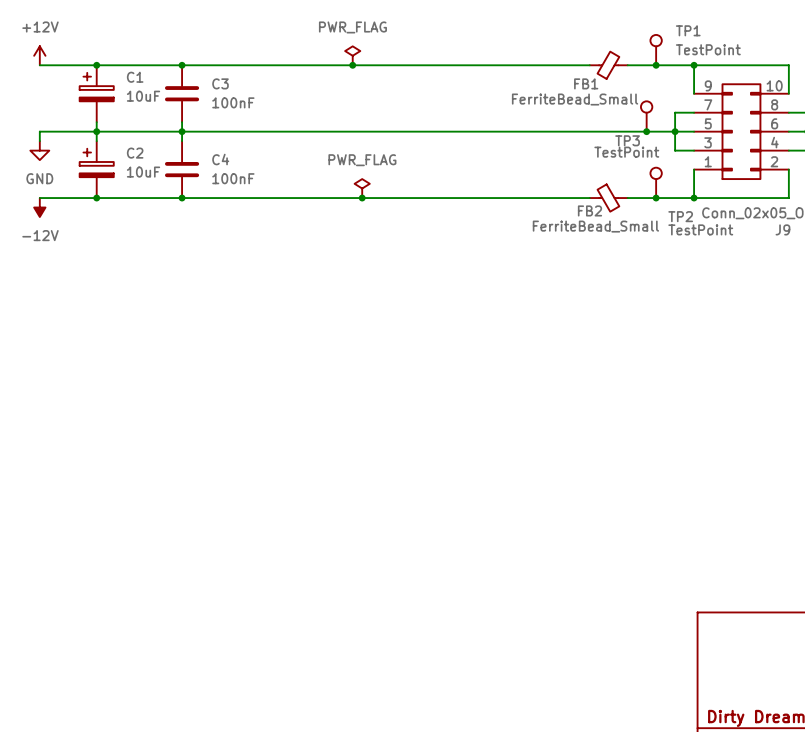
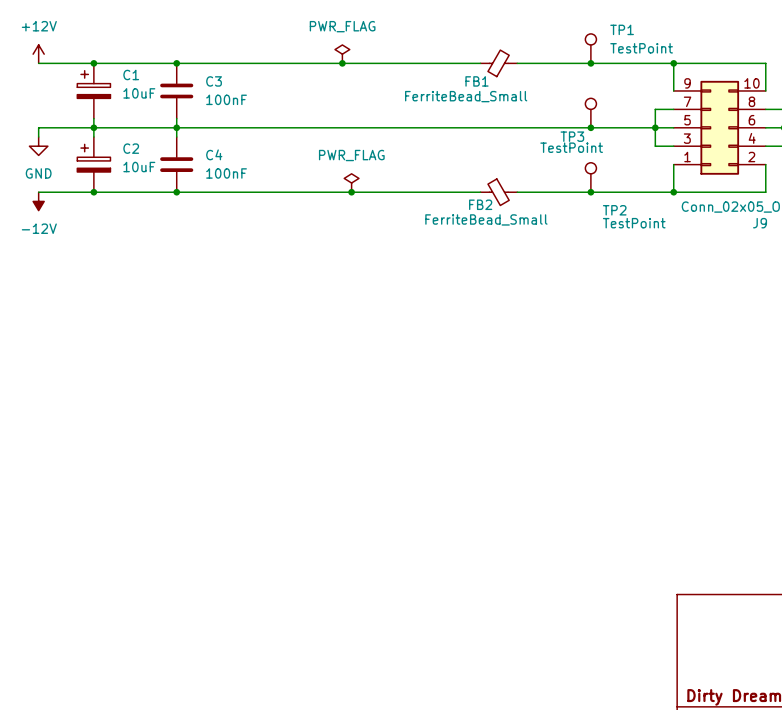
TP1 position: (656, 50) -> (590, 48)
junction: none -> (590, 63)
FB1 position: (608, 65) -> (498, 63)
junction: (656, 65) -> none
TP3 position: (646, 116) -> (590, 113)
junction position: (646, 131) -> (590, 127)
TP2 position: (656, 182) -> (590, 177)
junction: none -> (590, 192)
FB2 position: (608, 198) -> (498, 192)
junction: (656, 198) -> none

